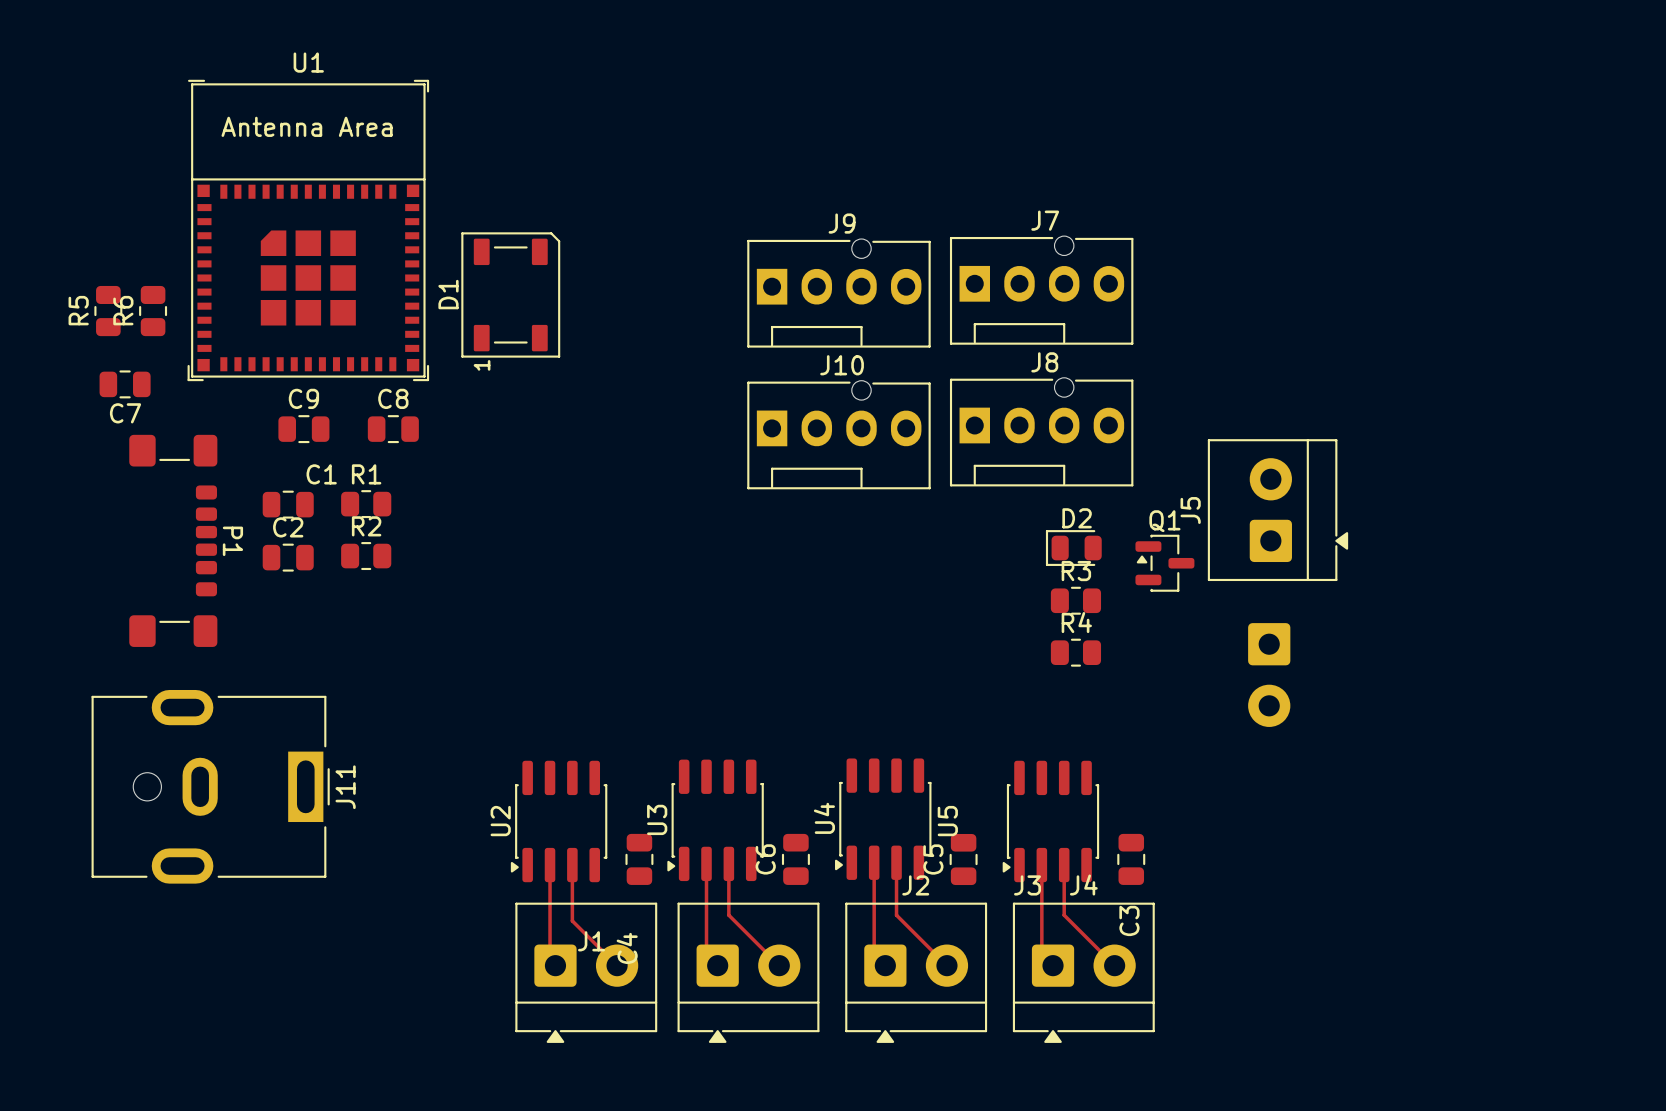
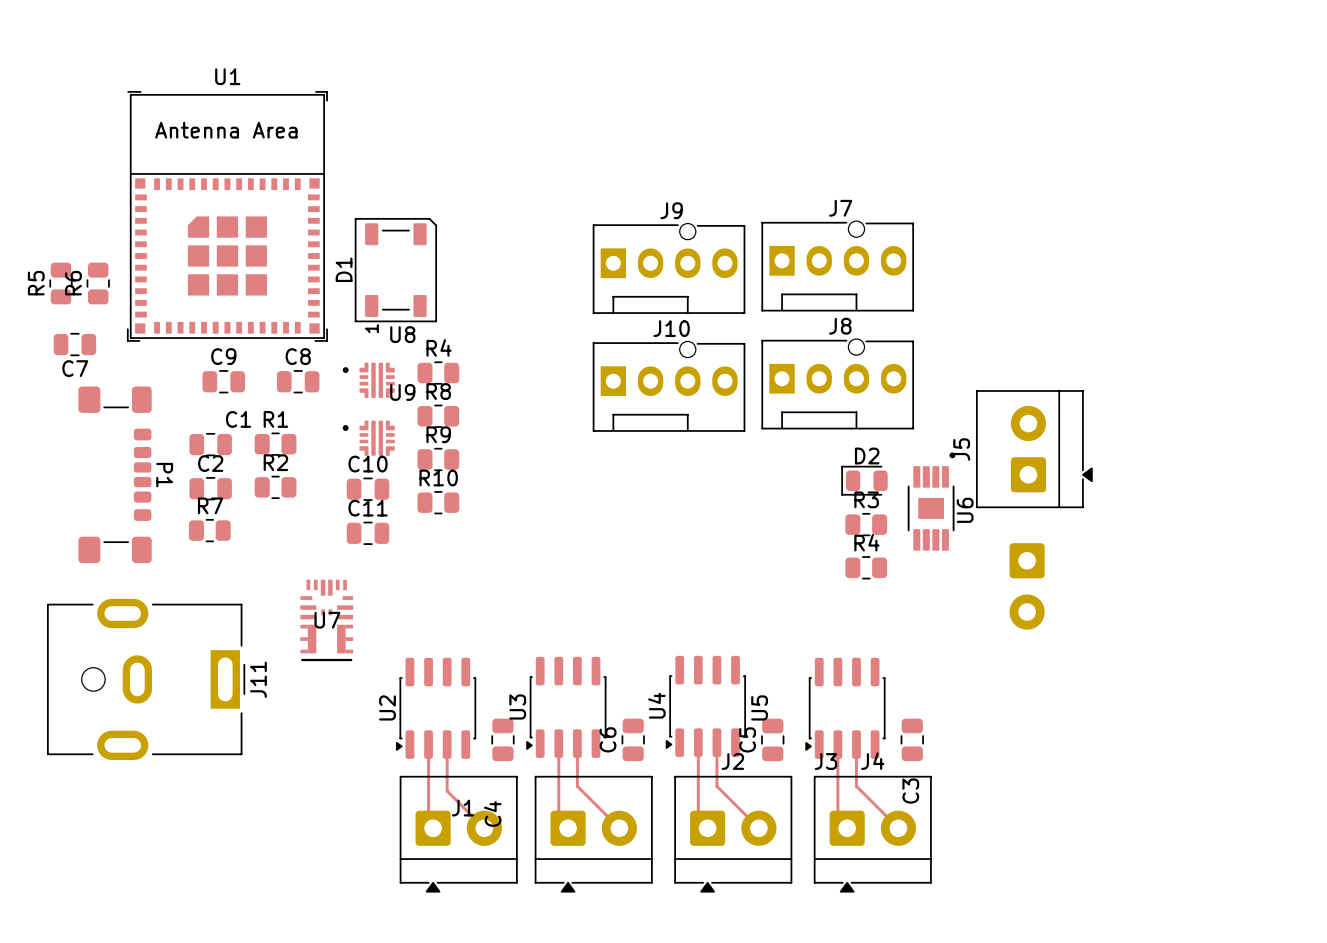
R4: none -> (438, 373)
U8: none -> (368, 380)
R8: none -> (438, 416)
U9: none -> (368, 438)
R9: none -> (438, 459)
C10: none -> (368, 489)
Q1: (1164, 563) -> none
U6: none -> (931, 501)
R10: none -> (438, 502)
R7: none -> (209, 530)
C11: none -> (368, 533)
U7: none -> (326, 620)

